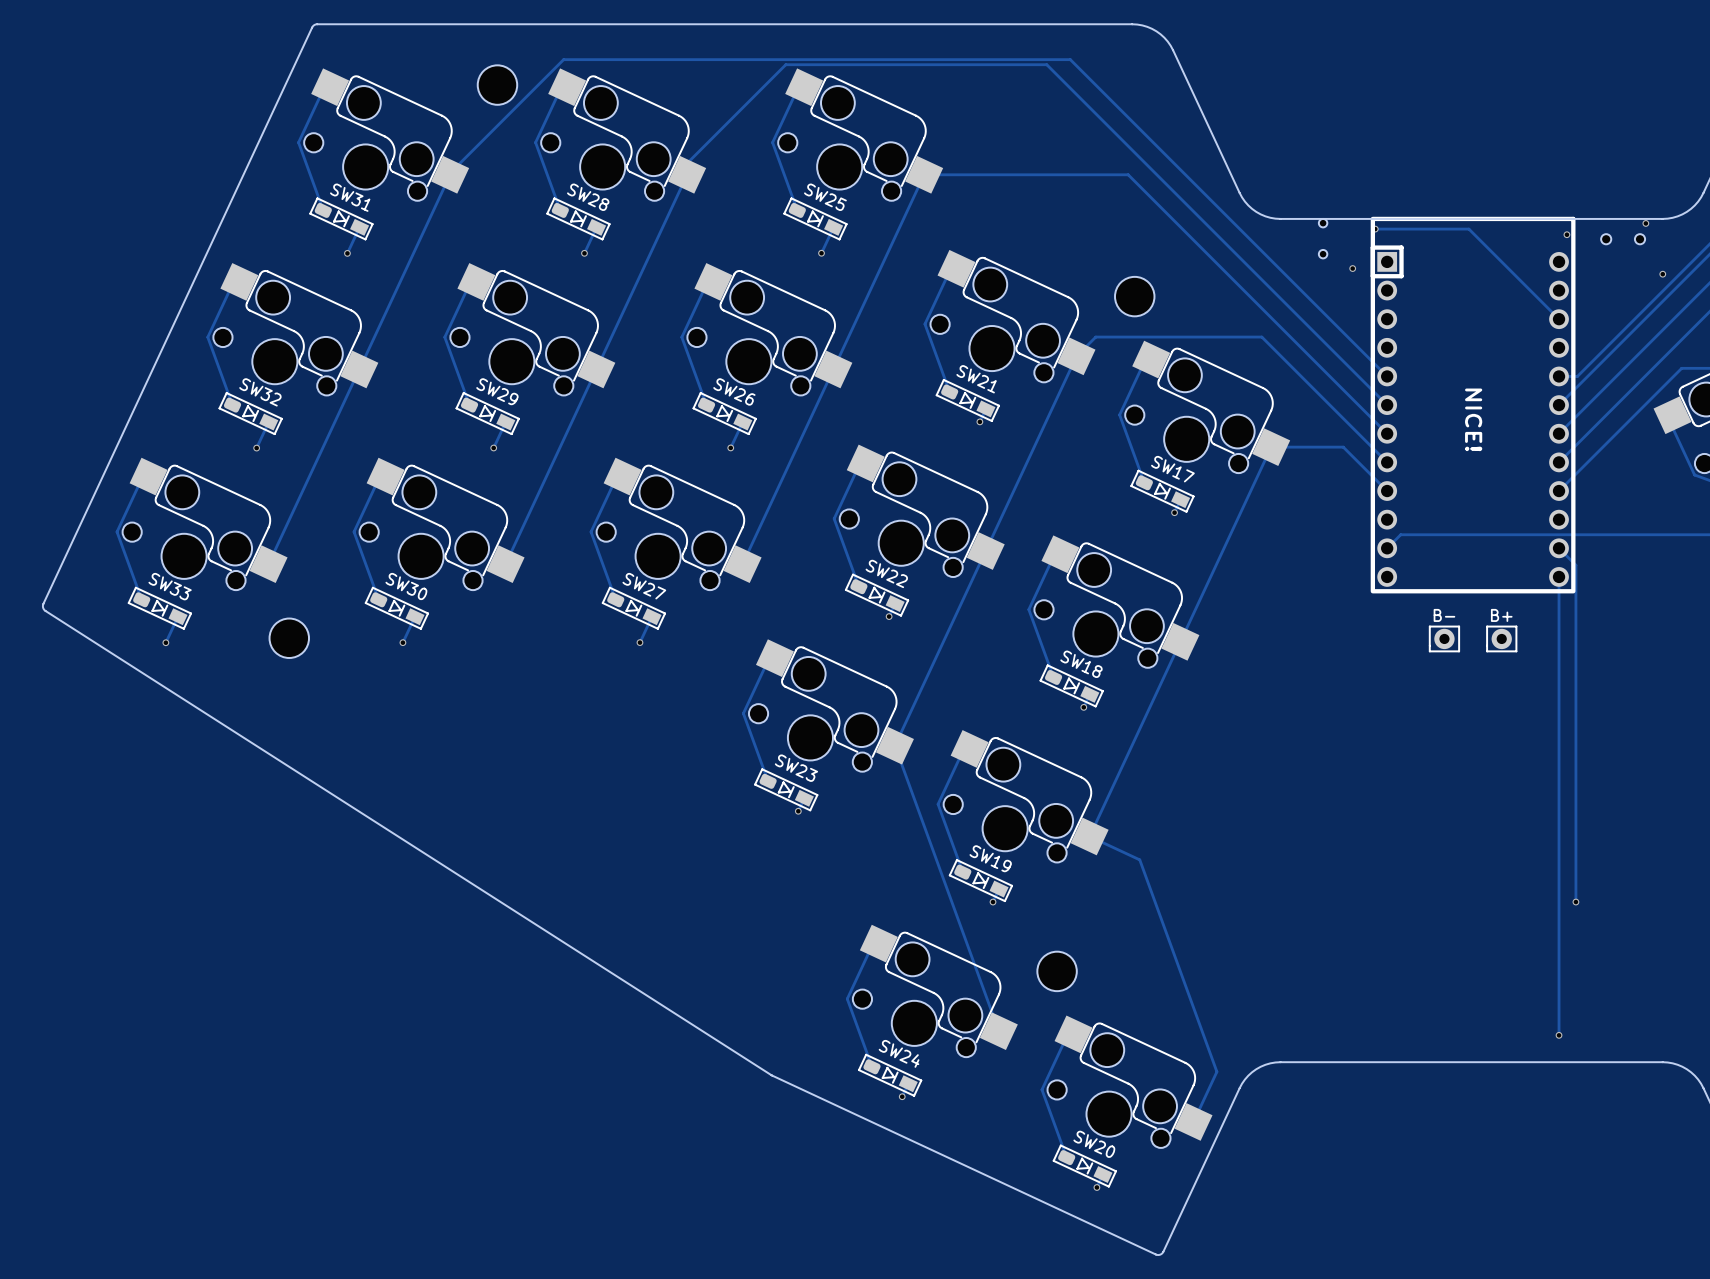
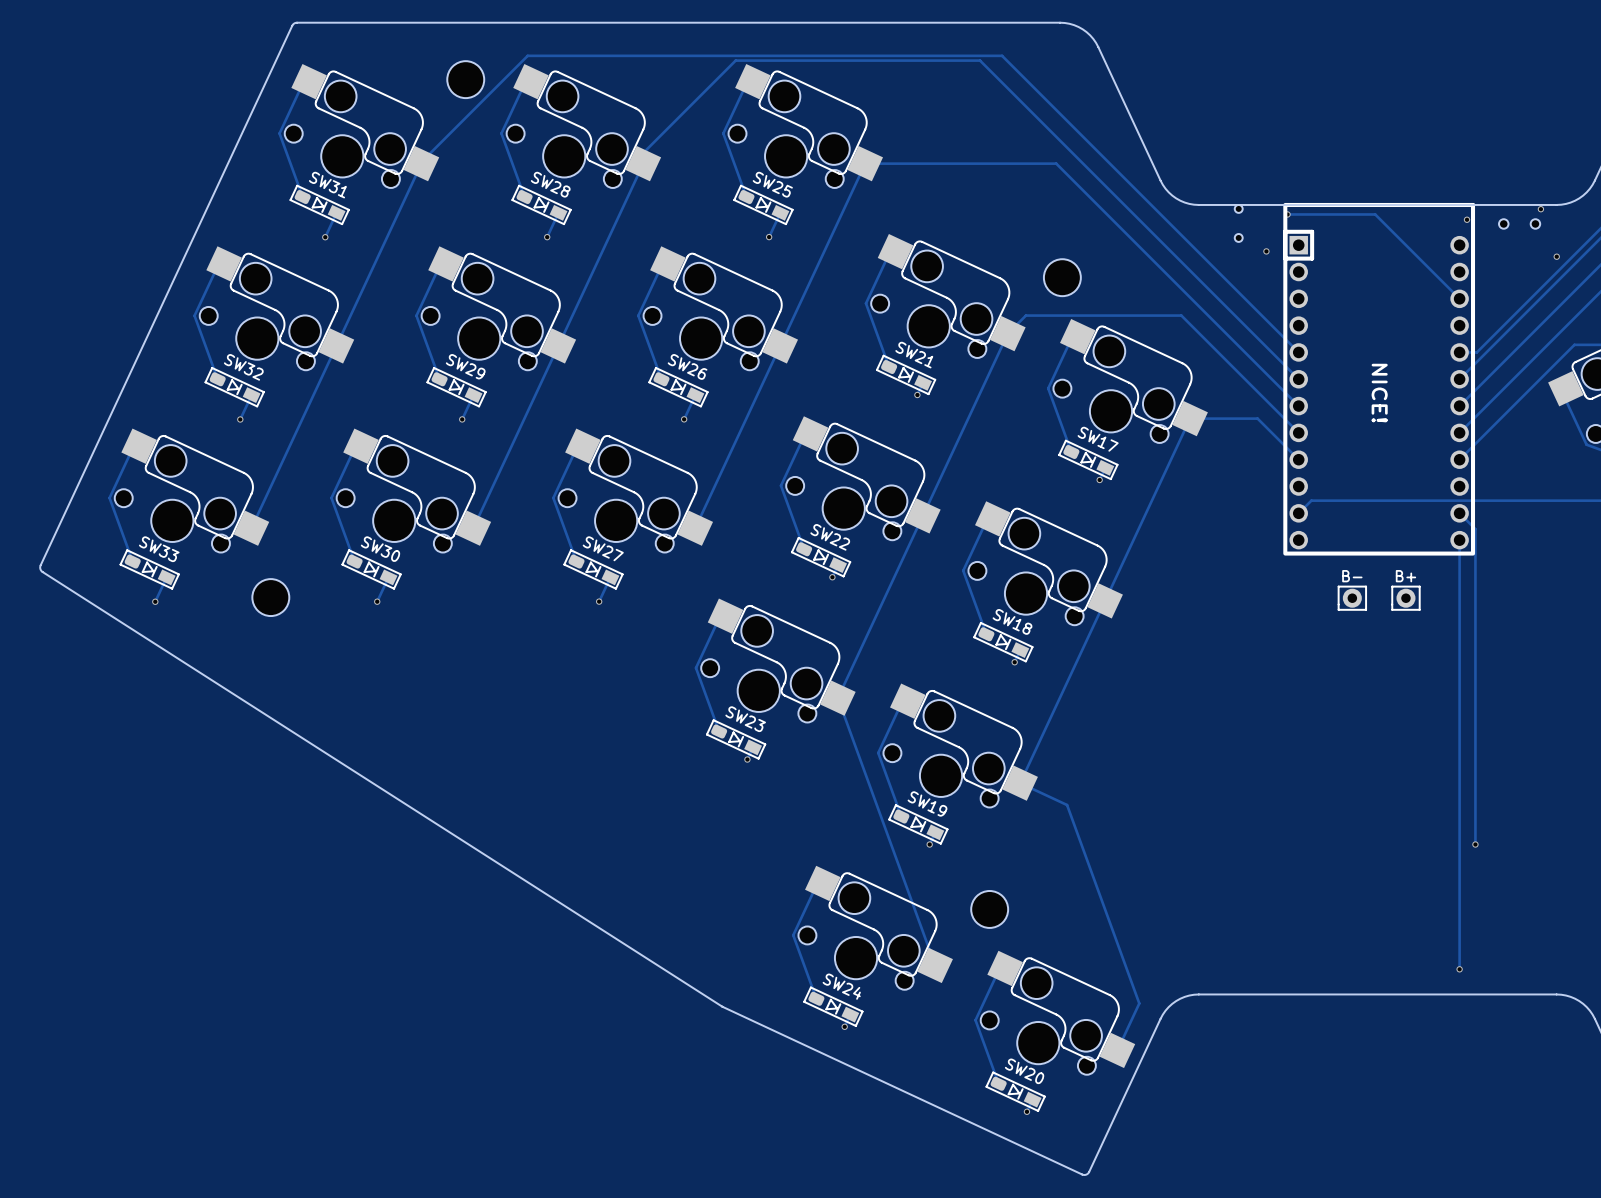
SW31 footprint: [304, 68, 470, 241] -> [284, 64, 440, 225]
SW28 footprint: [541, 68, 707, 241] -> [506, 64, 662, 225]
SW25 footprint: [778, 68, 944, 241] -> [728, 64, 884, 225]
SW21 footprint: [930, 249, 1096, 422] -> [871, 234, 1026, 395]
SW32 footprint: [213, 263, 379, 435] -> [199, 246, 355, 408]
SW29 footprint: [450, 263, 616, 435] -> [421, 246, 577, 408]
SW26 footprint: [687, 263, 853, 435] -> [643, 246, 799, 408]
SW17 footprint: [1125, 340, 1291, 513] -> [1053, 318, 1208, 480]
SW22 footprint: [839, 444, 1005, 617] -> [786, 416, 941, 578]
SW33 footprint: [122, 457, 288, 630] -> [114, 428, 270, 590]
SW30 footprint: [359, 457, 525, 630] -> [336, 428, 492, 590]
SW27 footprint: [596, 457, 762, 630] -> [558, 428, 714, 590]
SW18 footprint: [1034, 535, 1200, 708] -> [968, 501, 1123, 663]
SW23 footprint: [748, 639, 914, 812] -> [701, 598, 856, 760]
SW19 footprint: [943, 730, 1109, 902] -> [883, 683, 1038, 845]
SW24 footprint: [852, 924, 1018, 1097] -> [798, 865, 953, 1027]
SW20 footprint: [1047, 1015, 1213, 1188] -> [980, 950, 1136, 1112]

